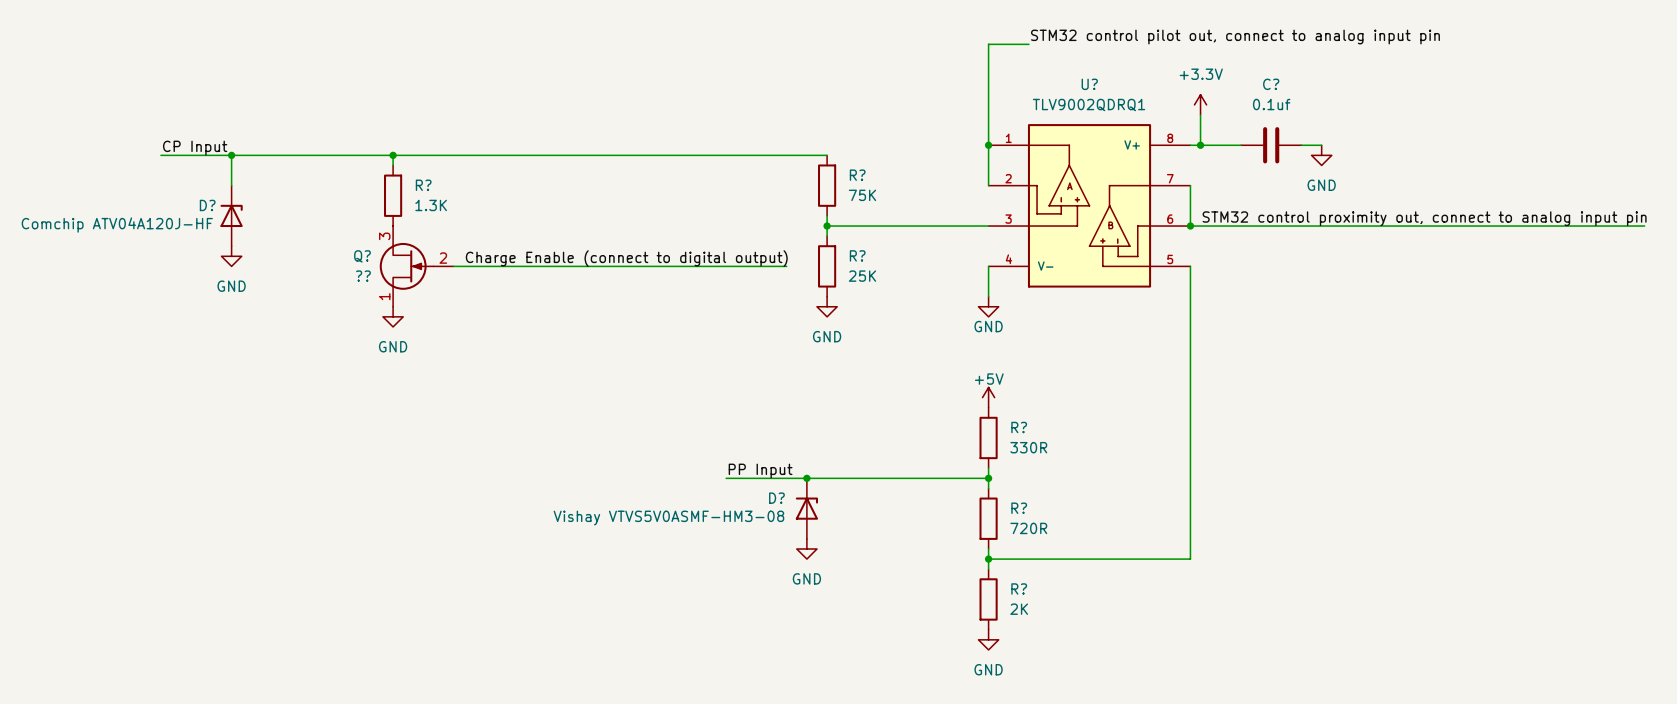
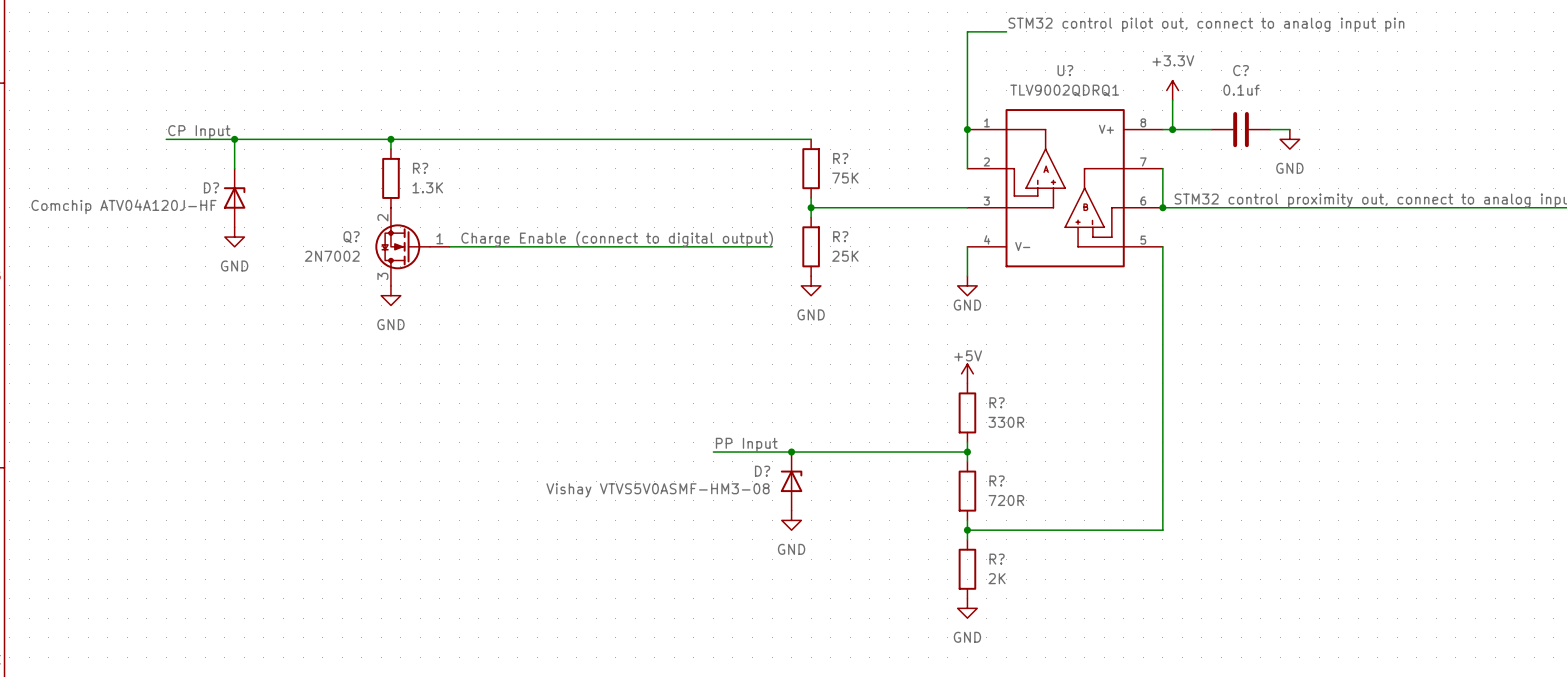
Q? symbol: [379, 226, 454, 307] -> [375, 207, 450, 286]
Q? value: ?? (363, 276) -> 2N7002 (332, 256)

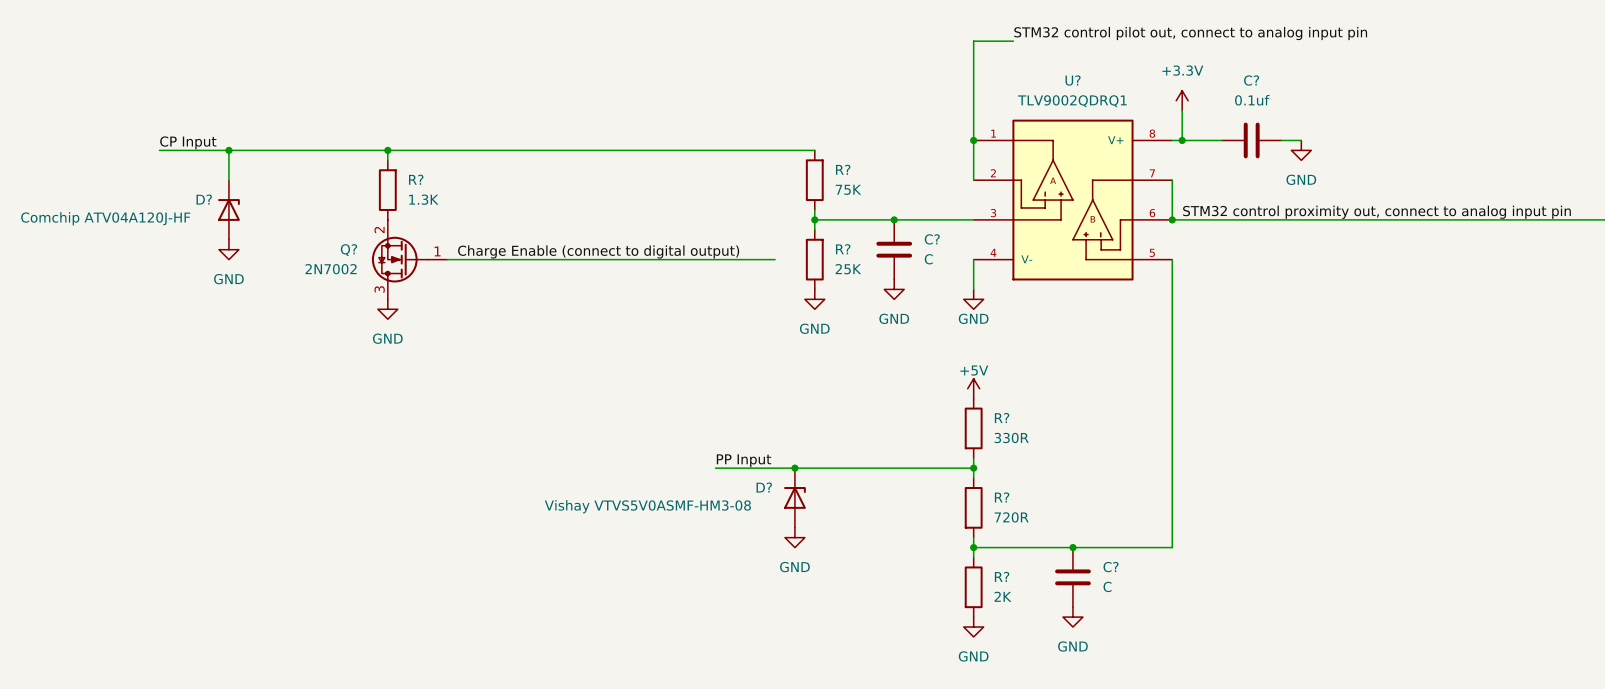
junction: none -> (894, 219)
C?: none -> C (894, 249)
power symbol: none -> GND (894, 289)
junction: none -> (1072, 547)
C?: none -> C (1072, 577)
power symbol: none -> GND (1072, 617)

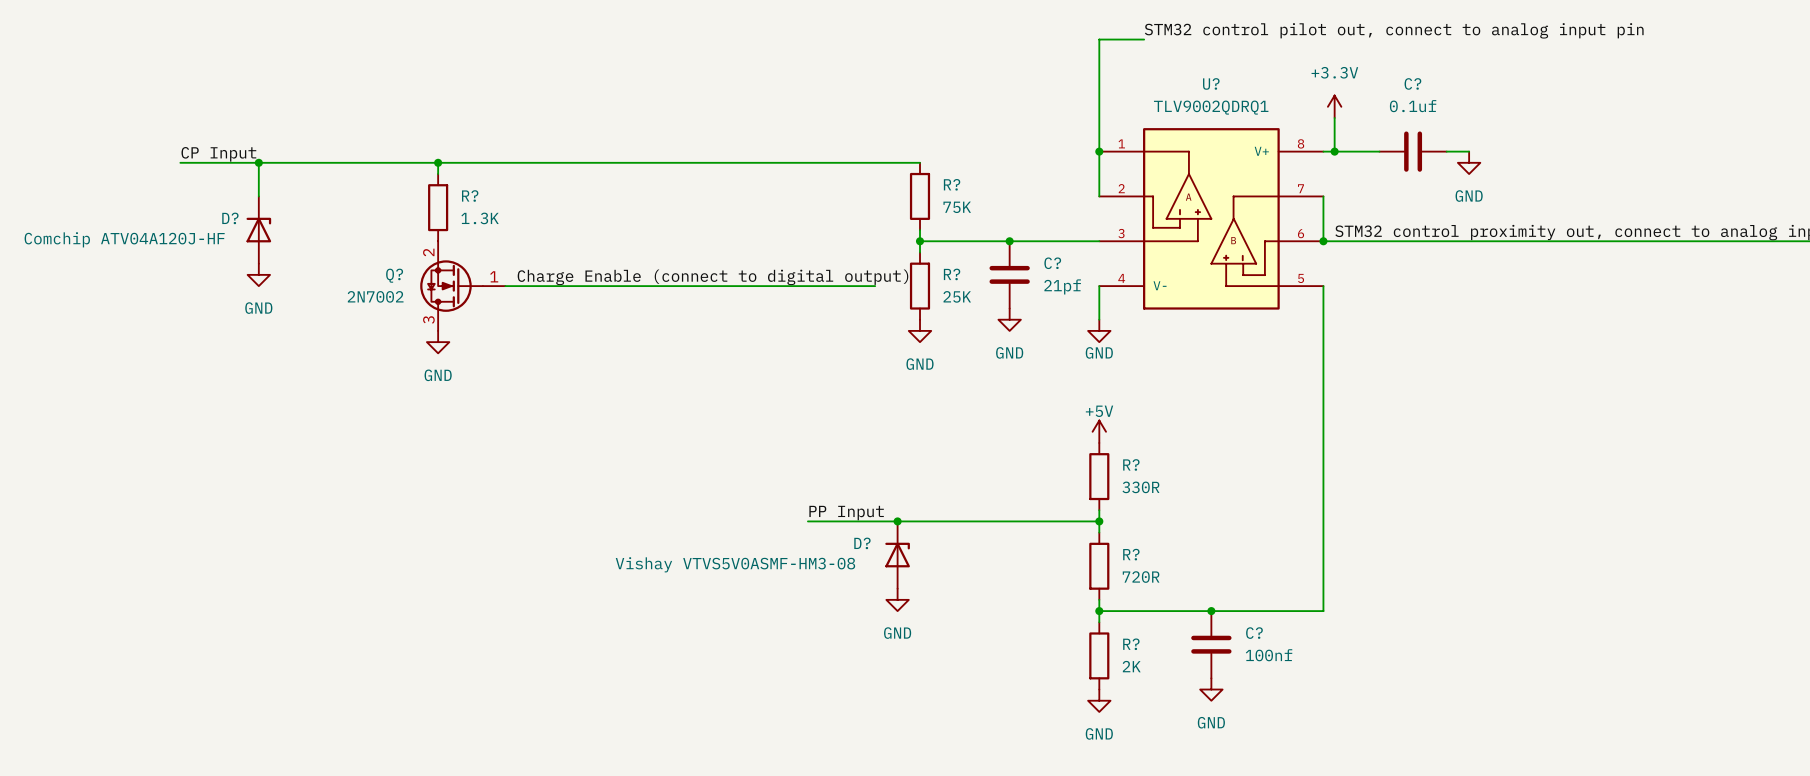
C? value: C (928, 259) -> 21pf (1062, 286)
C? value: C (1107, 586) -> 100nf (1269, 655)

